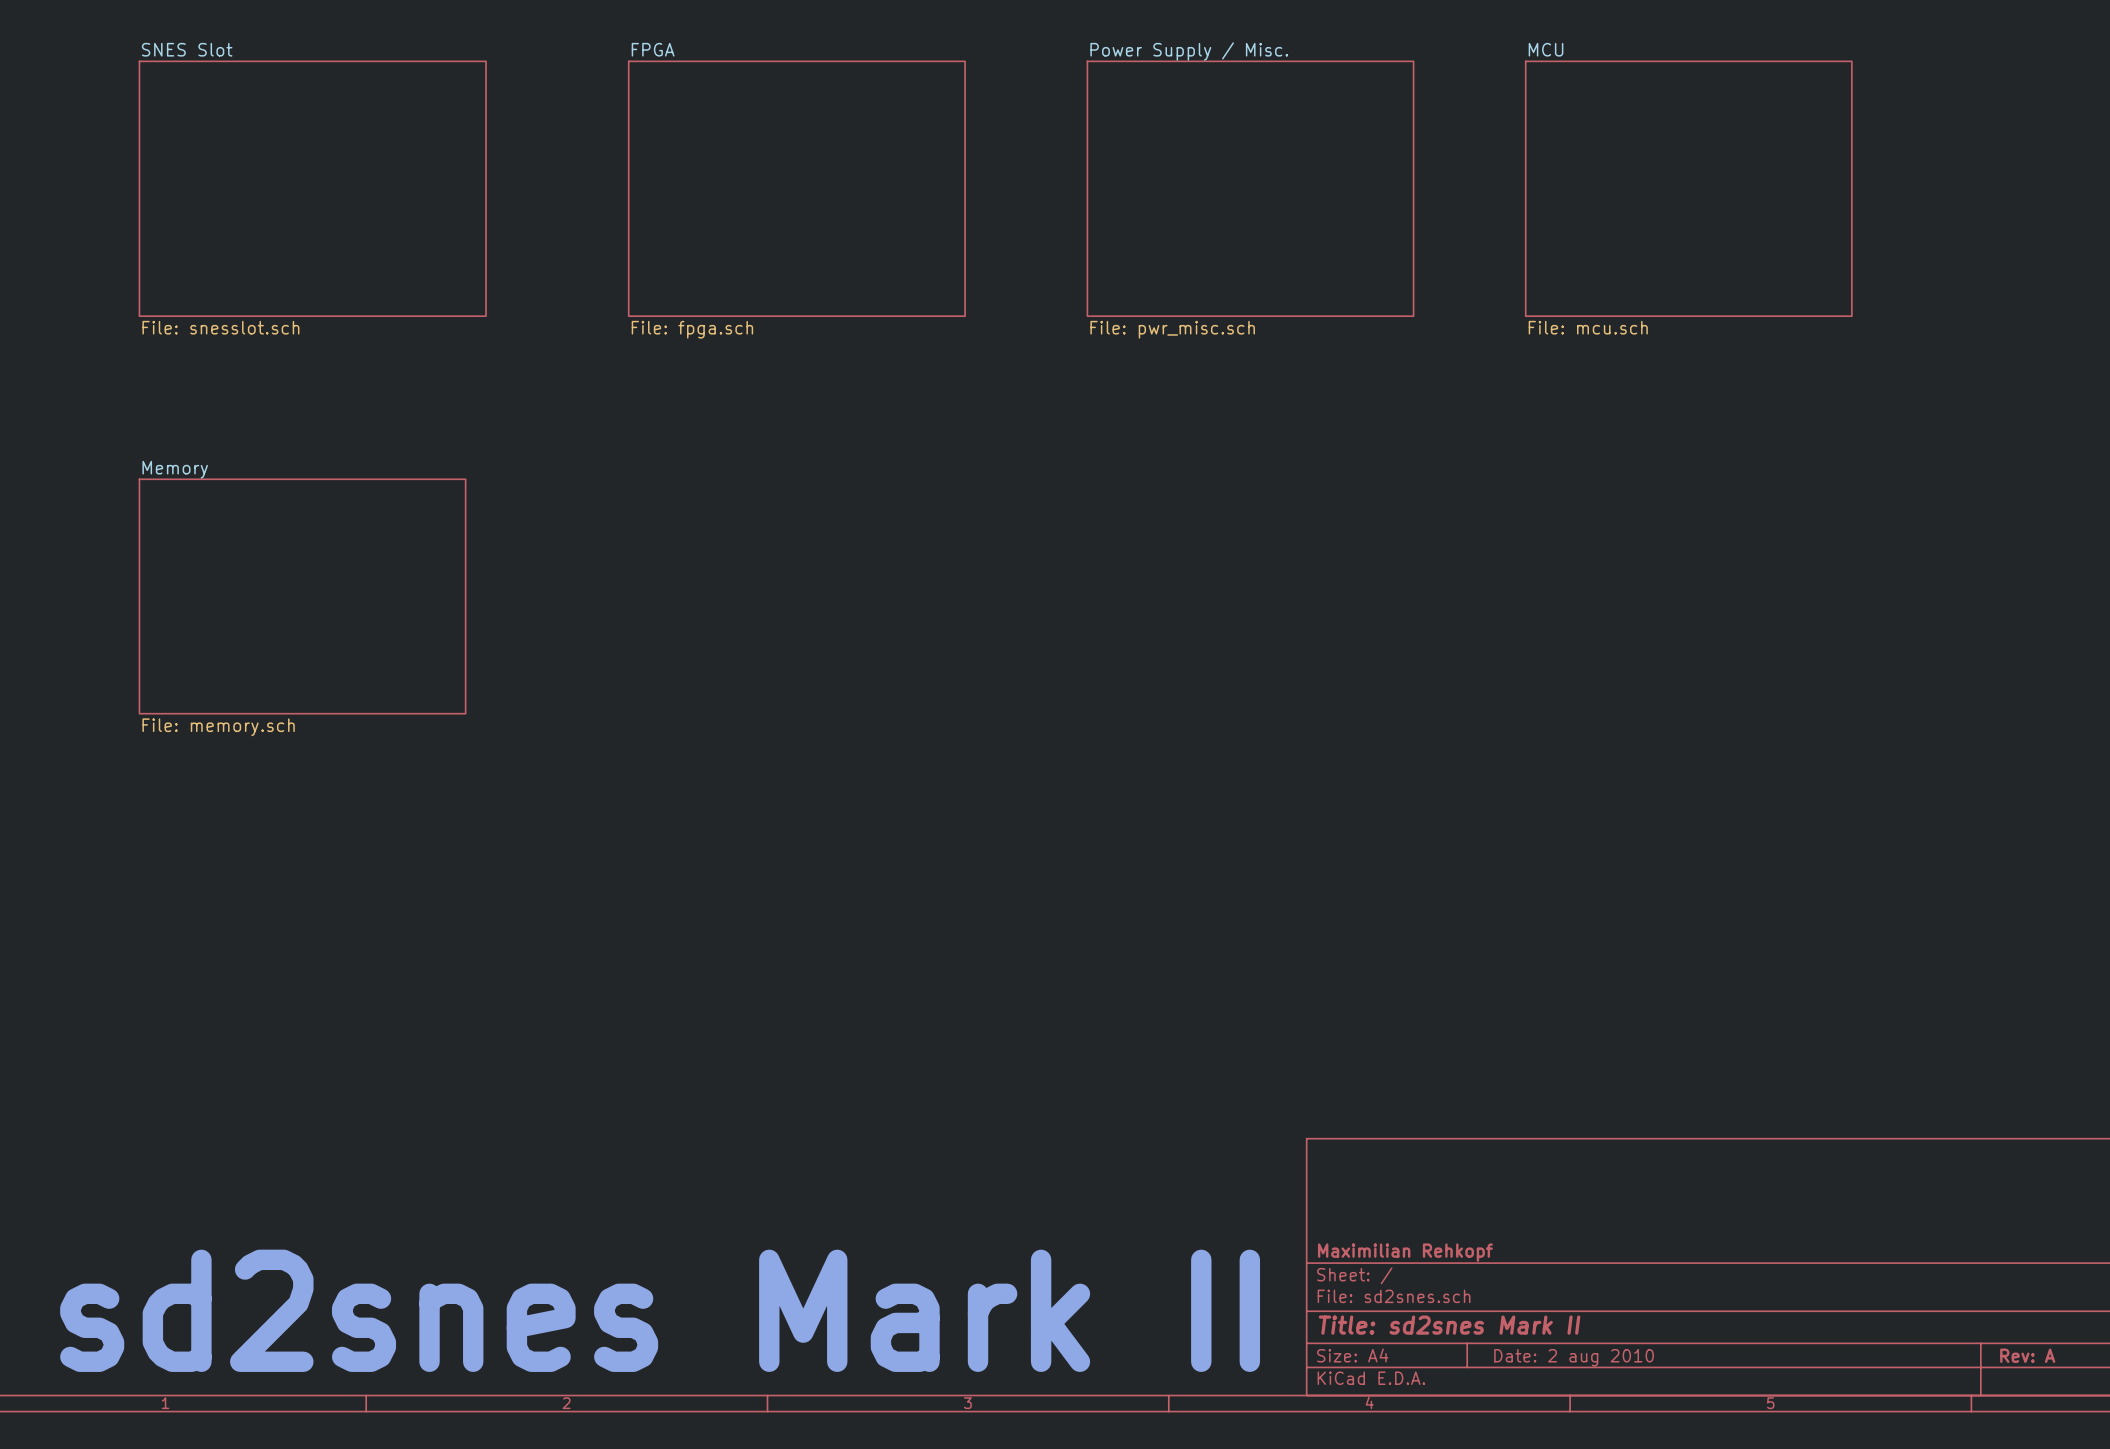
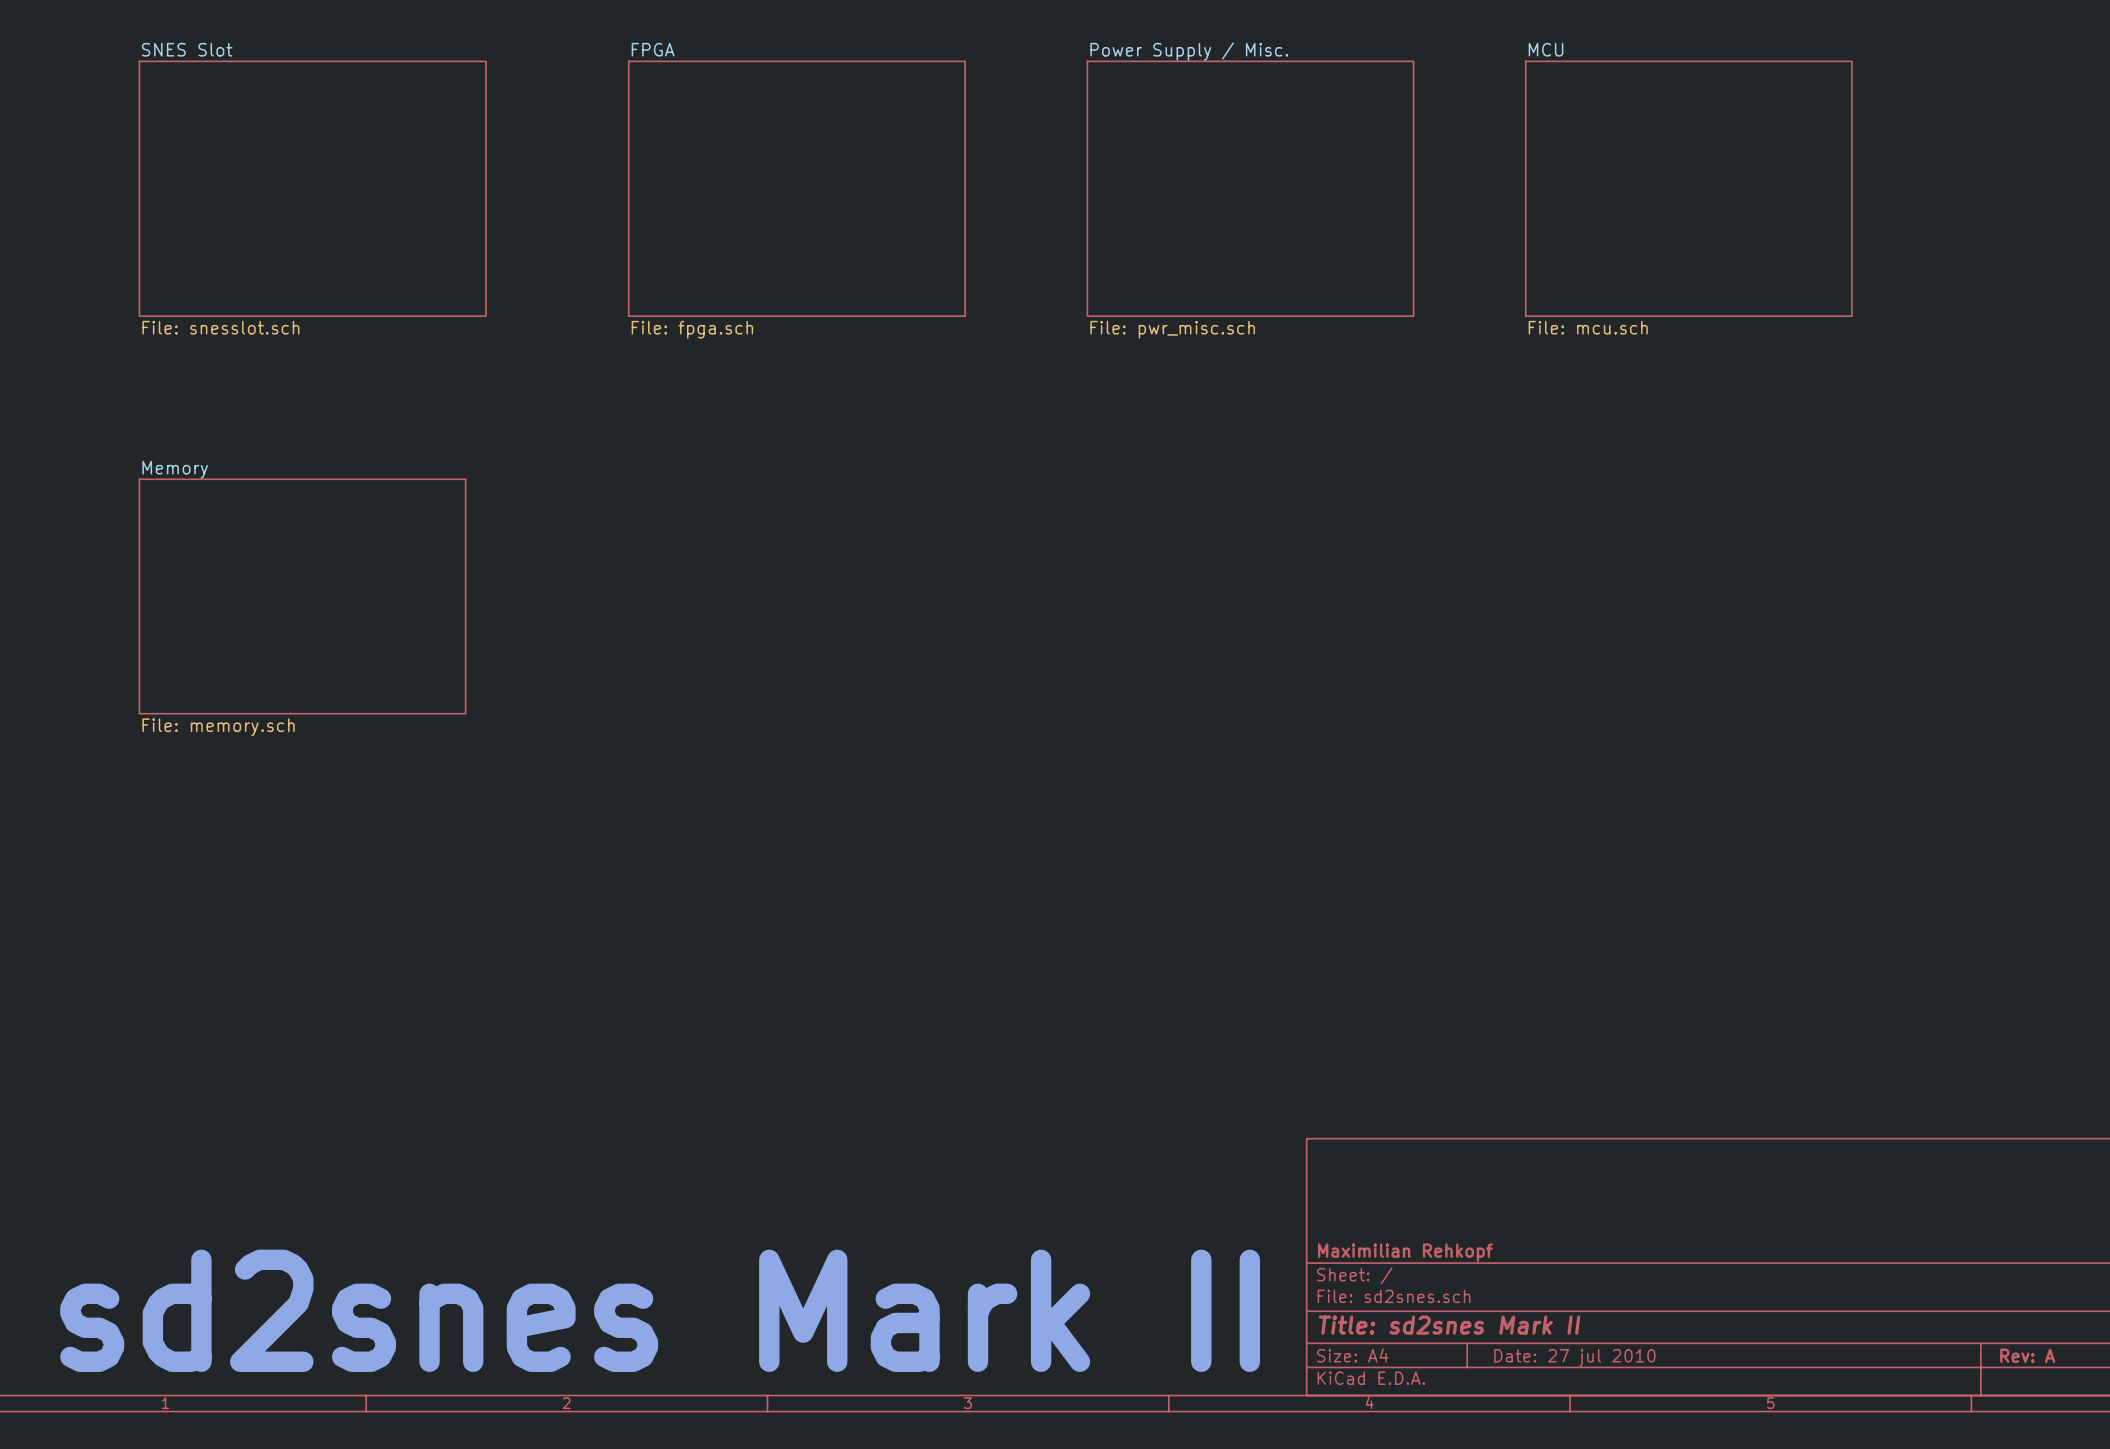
title block: Date: 2 aug 2010 (1574, 1357) -> Date: 27 jul 2010 (1574, 1357)

